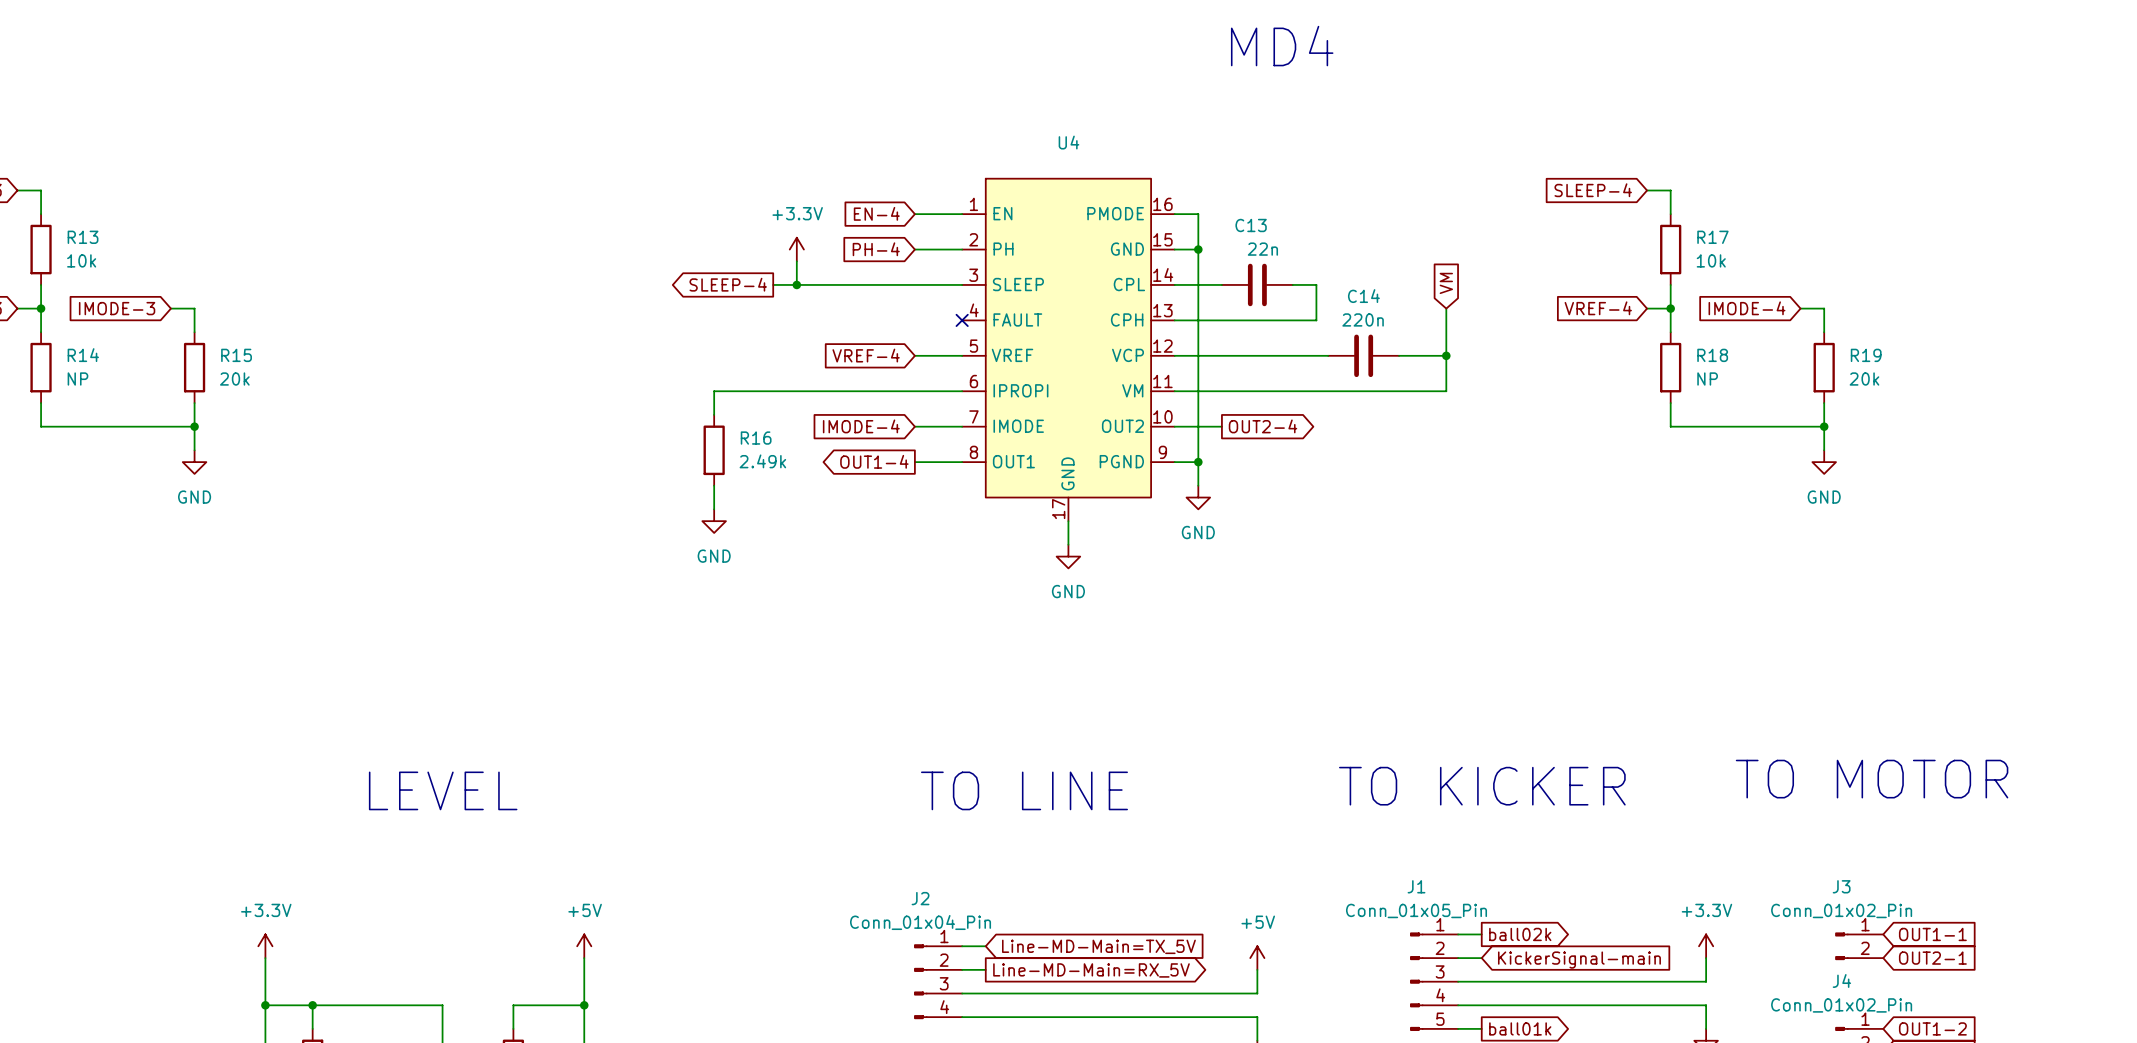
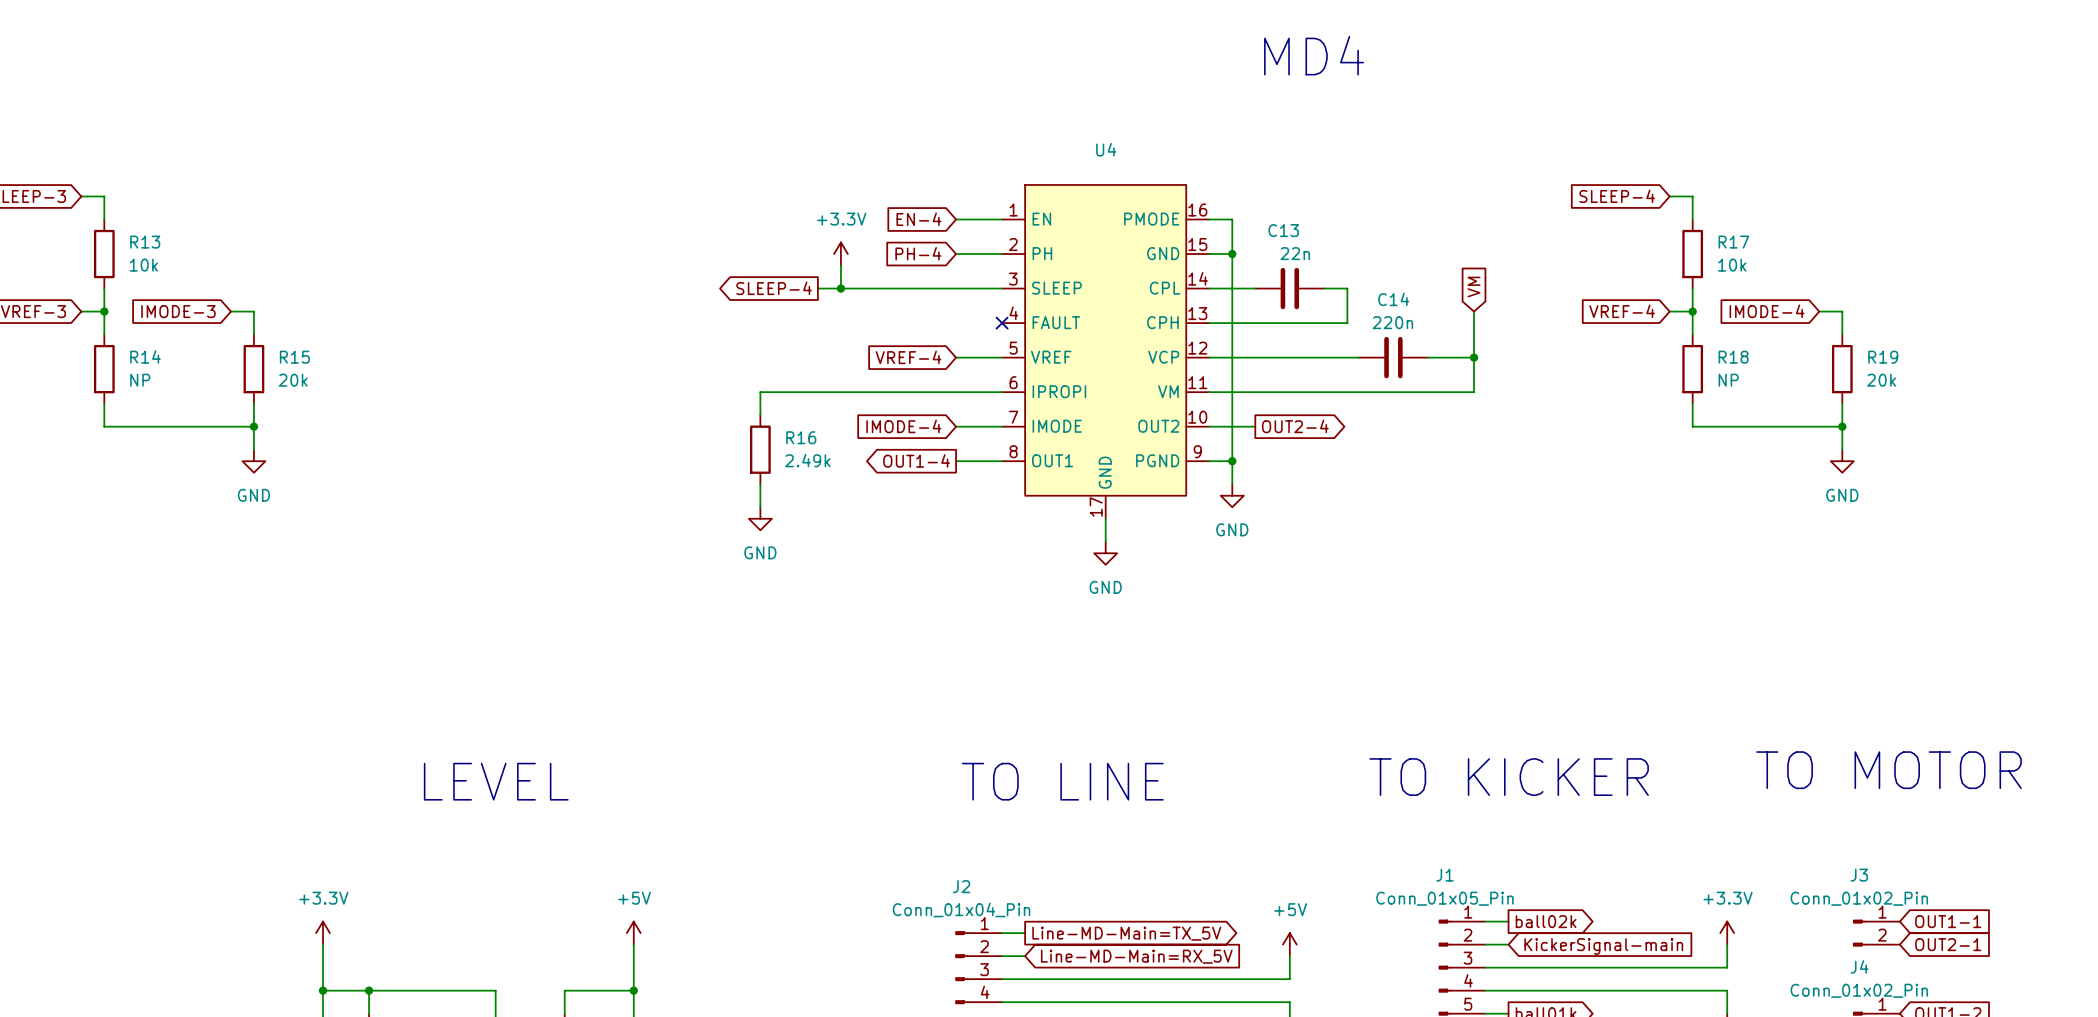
global label shape: input (1098, 946) -> output (1126, 933)
global label shape: output (1091, 970) -> input (1136, 956)

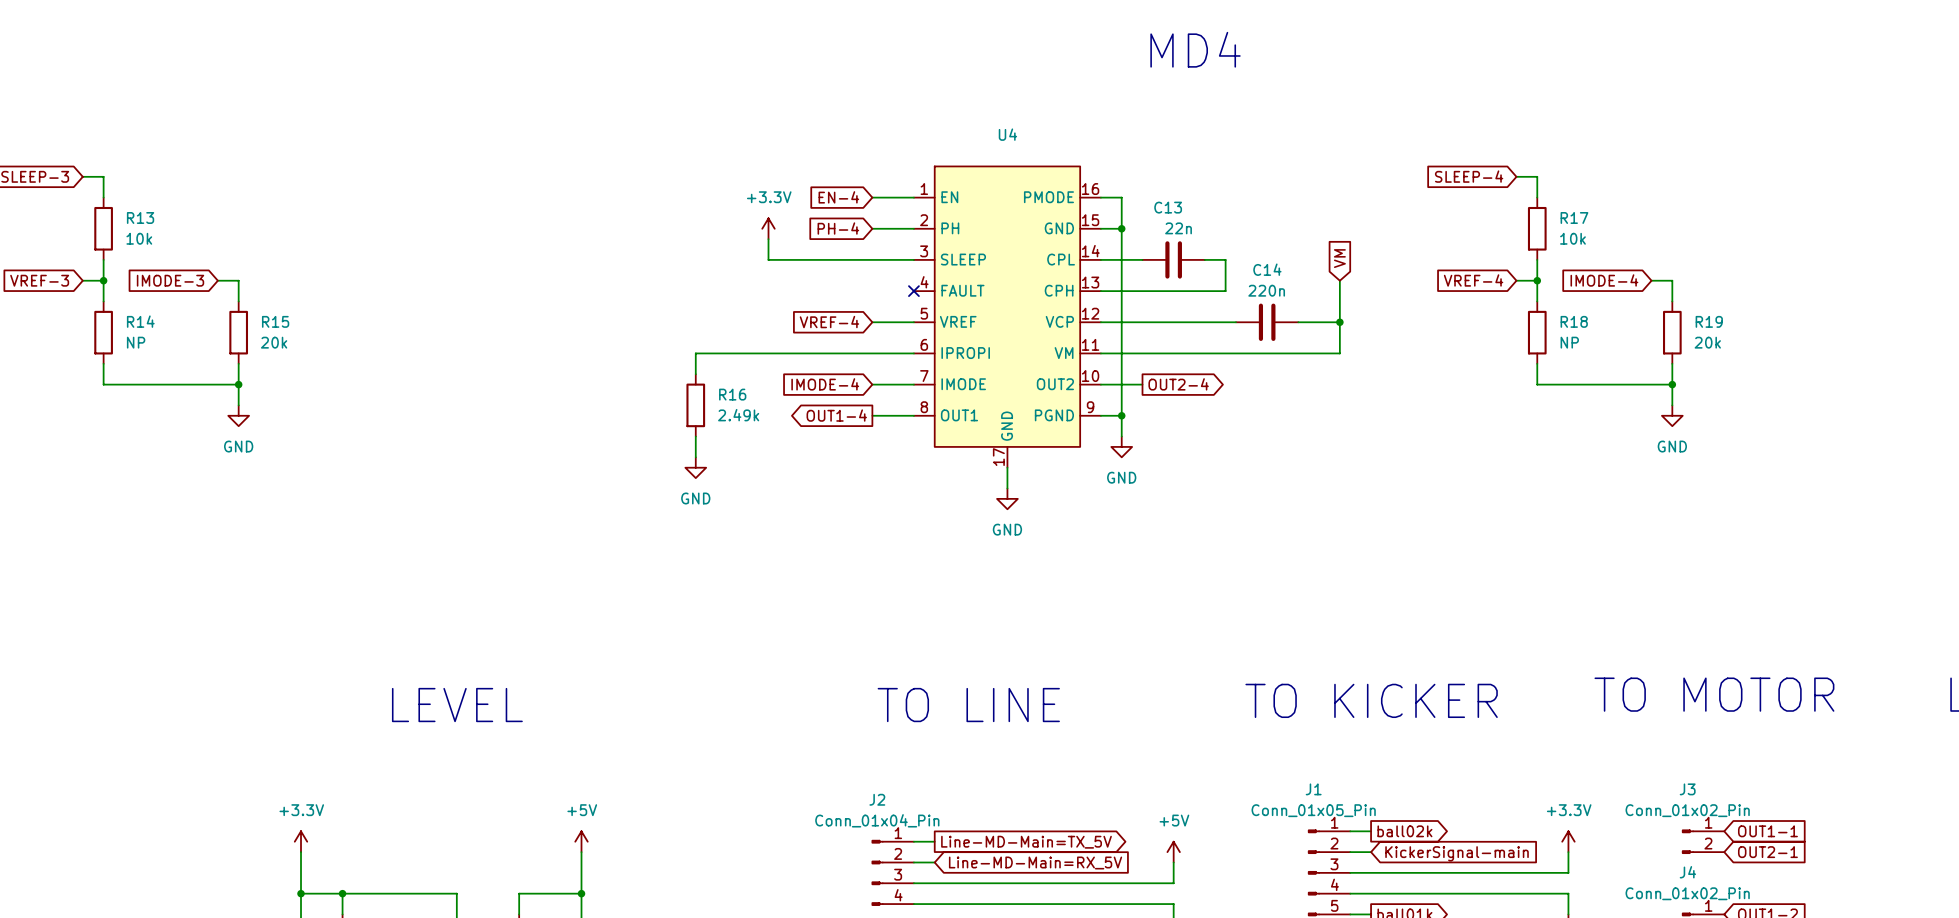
global label: SLEEP-4 (774, 288) -> none
wire: (817, 288) (840, 288) -> none
junction: (840, 288) -> none

